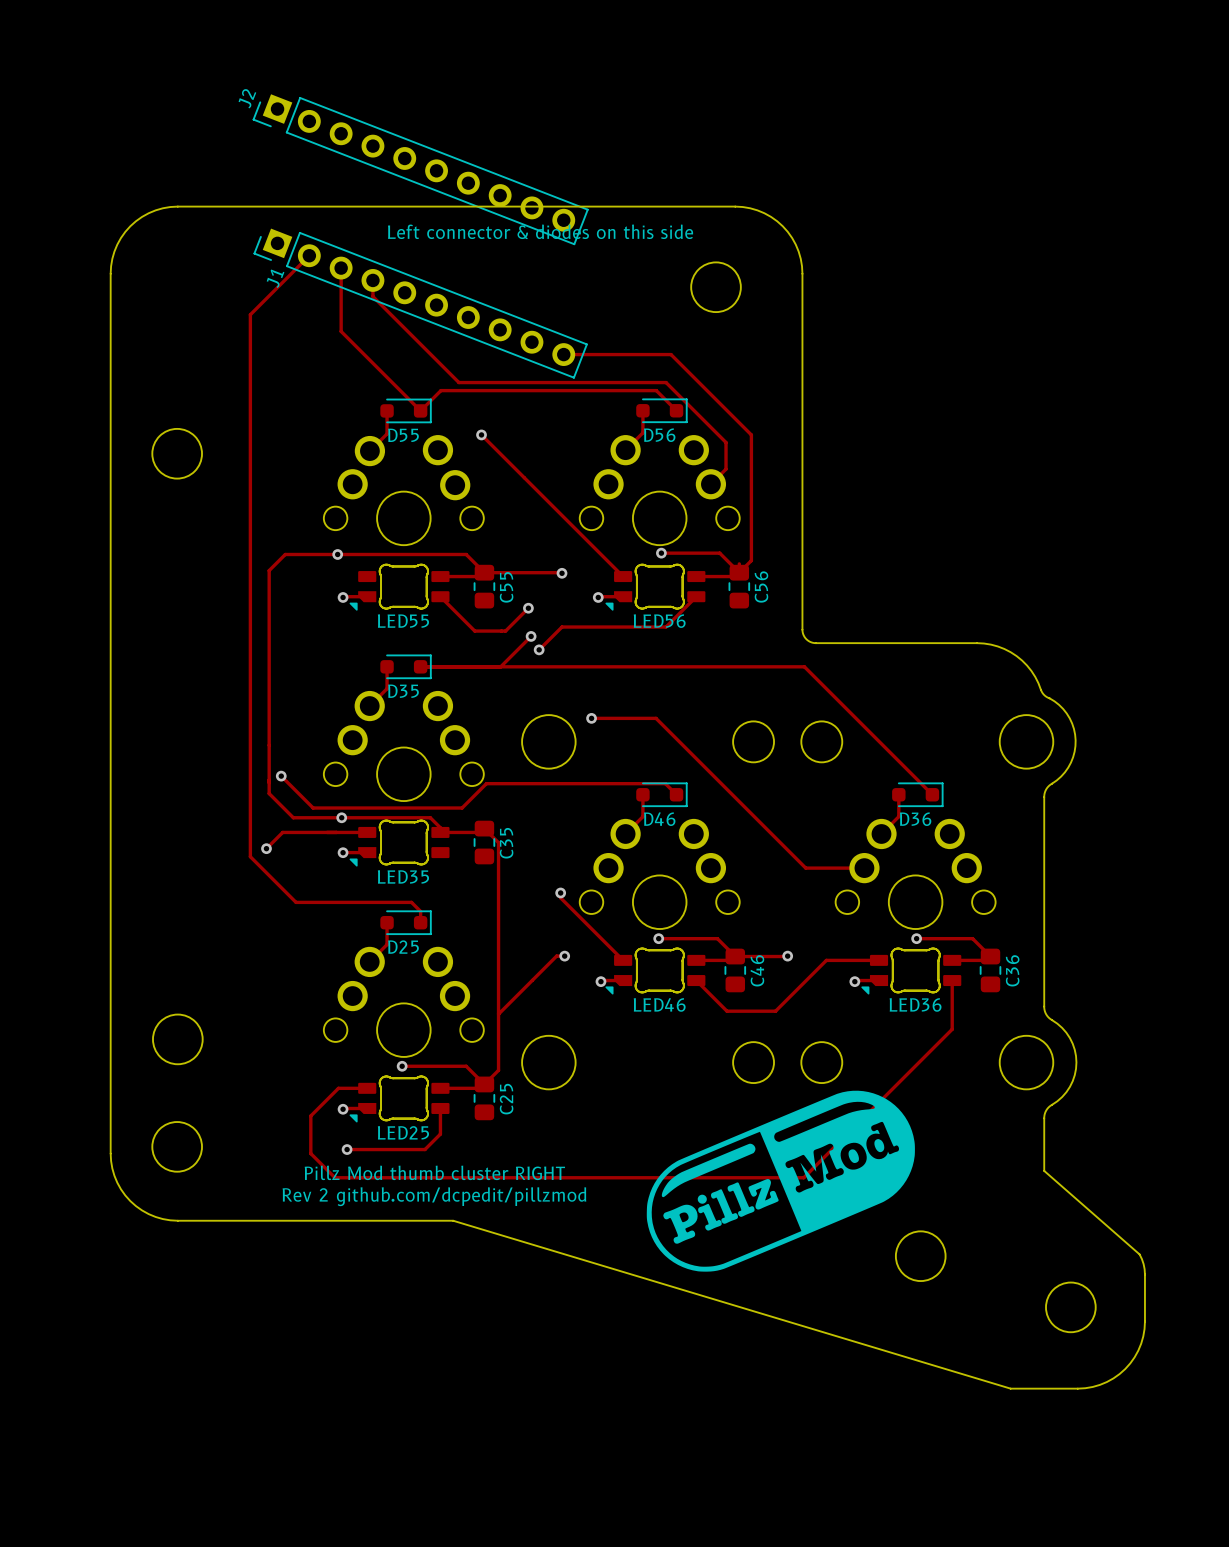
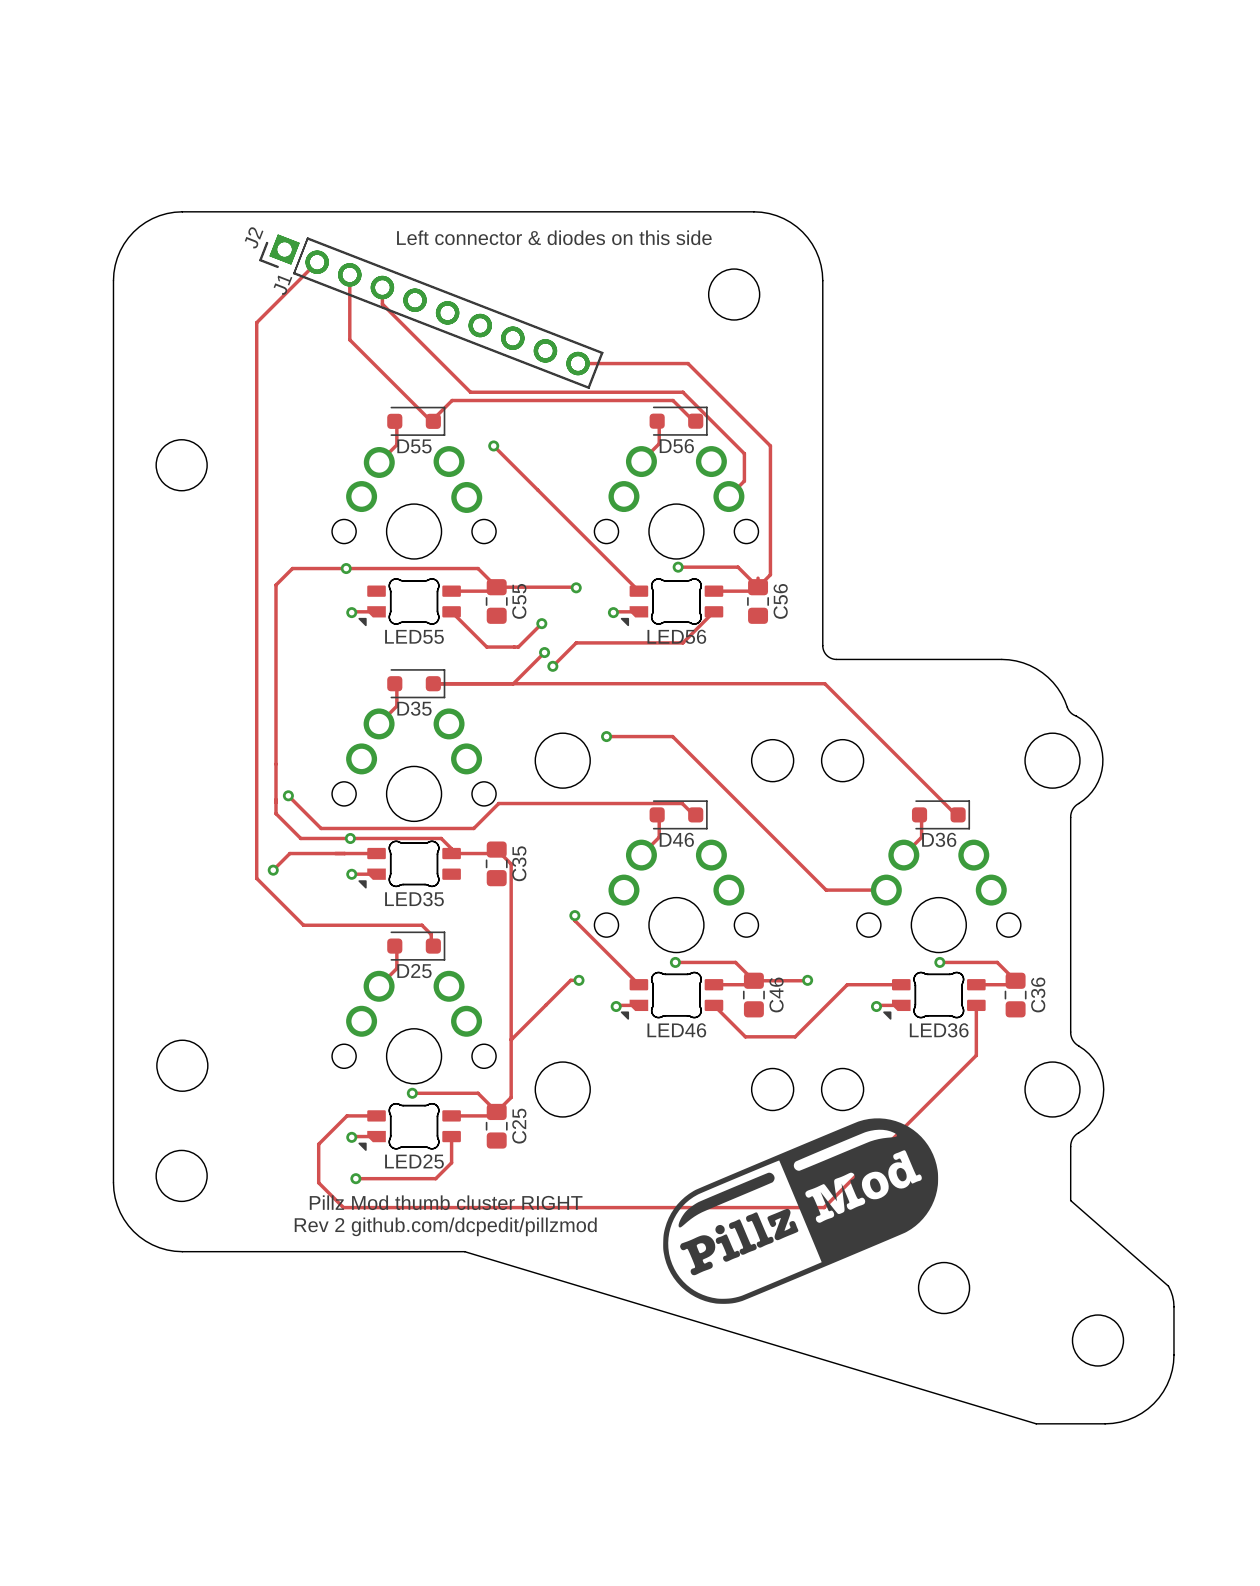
J2 position: (420, 169) -> (431, 311)
D55 footprint: [380, 398, 432, 424] -> [387, 406, 446, 436]
D56 footprint: [636, 398, 688, 423] -> [649, 406, 708, 436]
D35 footprint: [380, 654, 432, 680] -> [387, 669, 446, 699]
D46 footprint: [636, 782, 688, 807] -> [649, 800, 708, 830]
D36 footprint: [892, 782, 944, 807] -> [911, 800, 971, 830]
D25 footprint: [380, 910, 432, 935] -> [387, 931, 446, 961]

